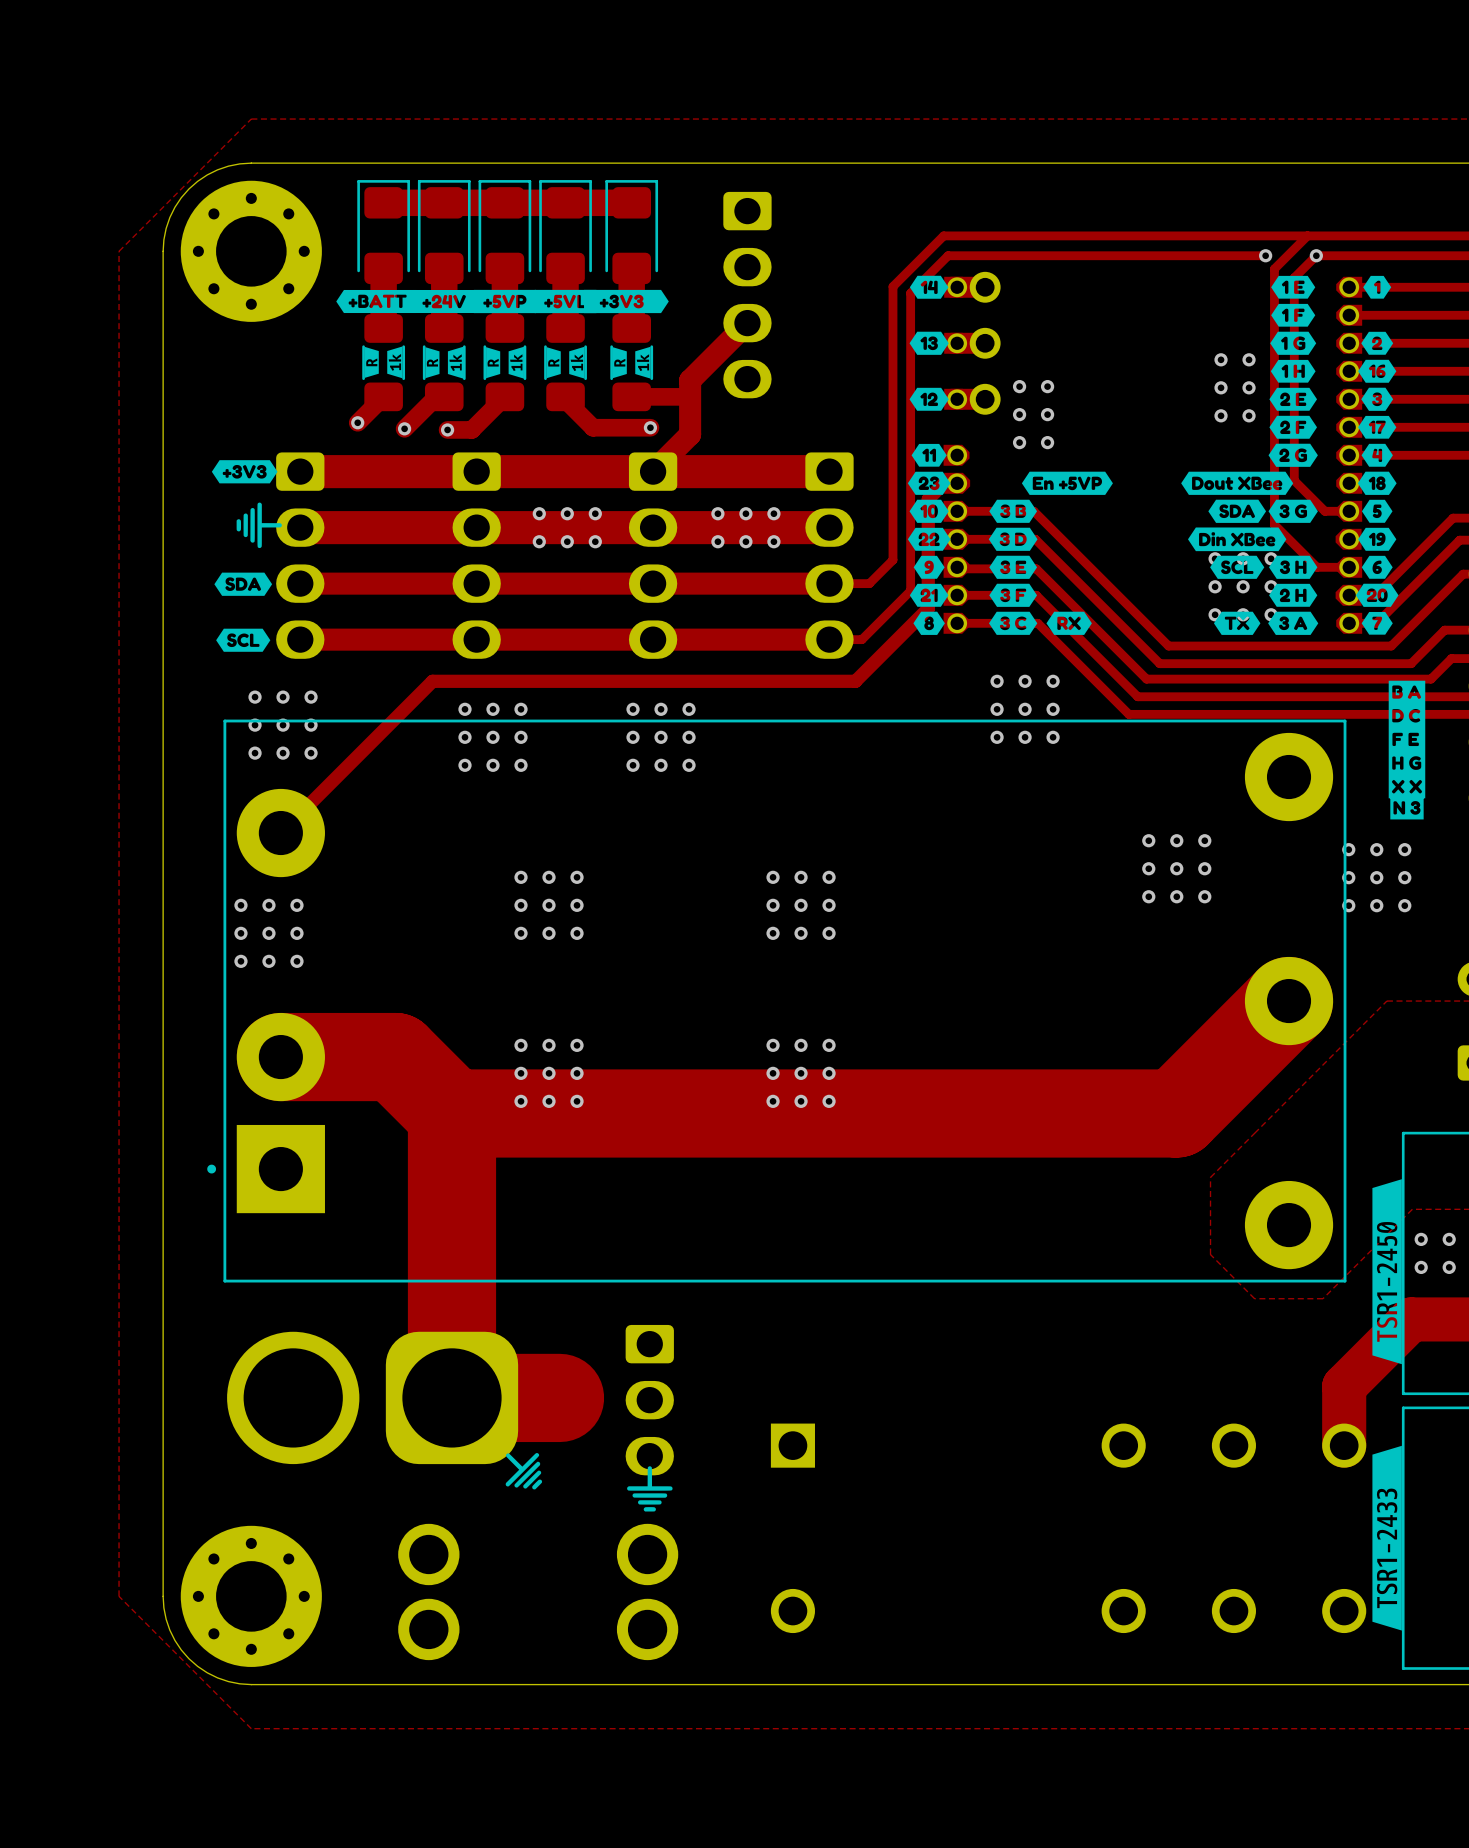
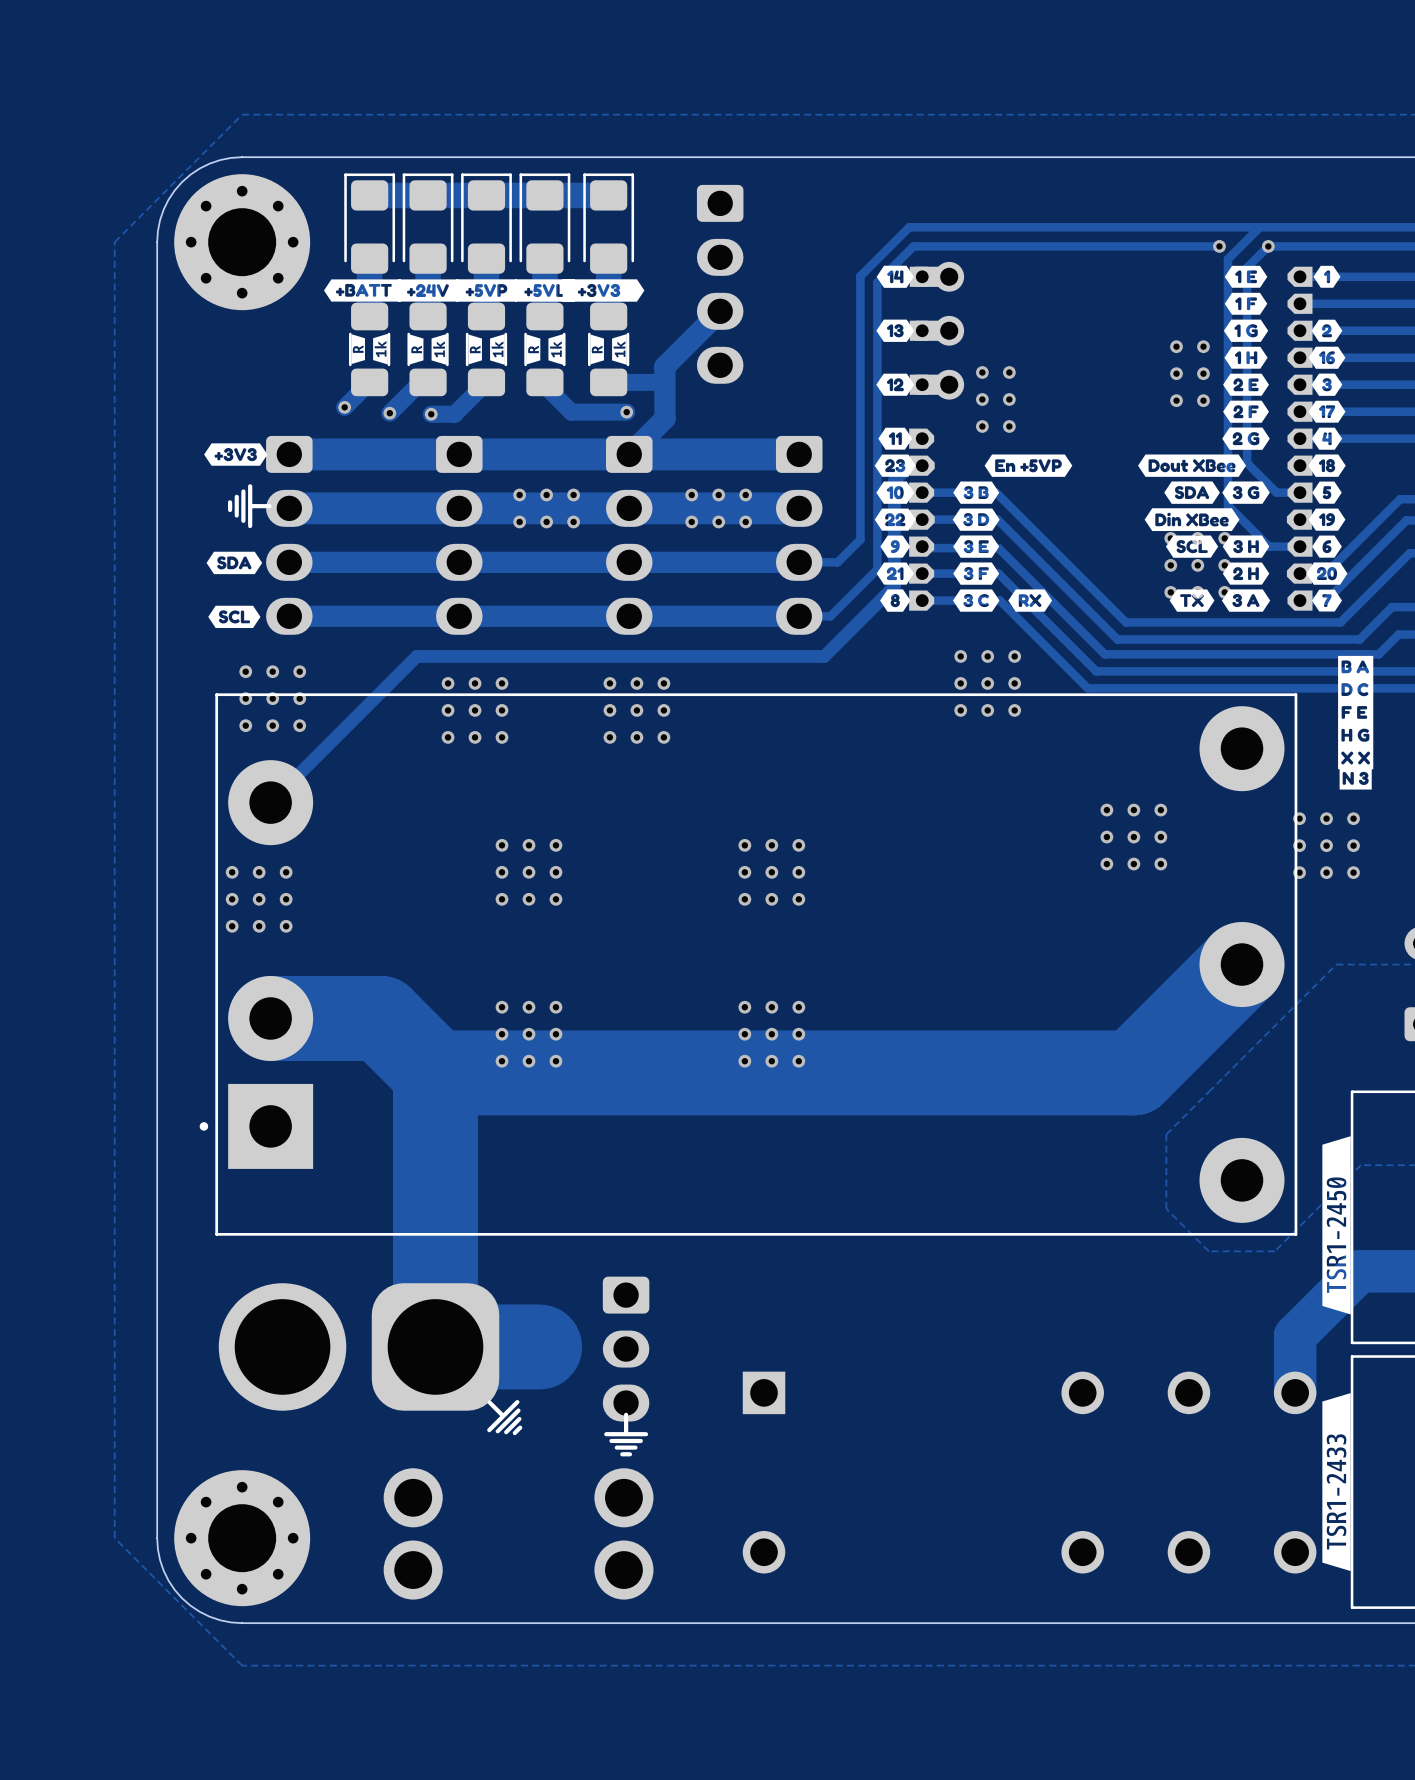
via: (1421, 1239) -> none
via: (1449, 1239) -> none
via: (1421, 1267) -> none
via: (1449, 1267) -> none

